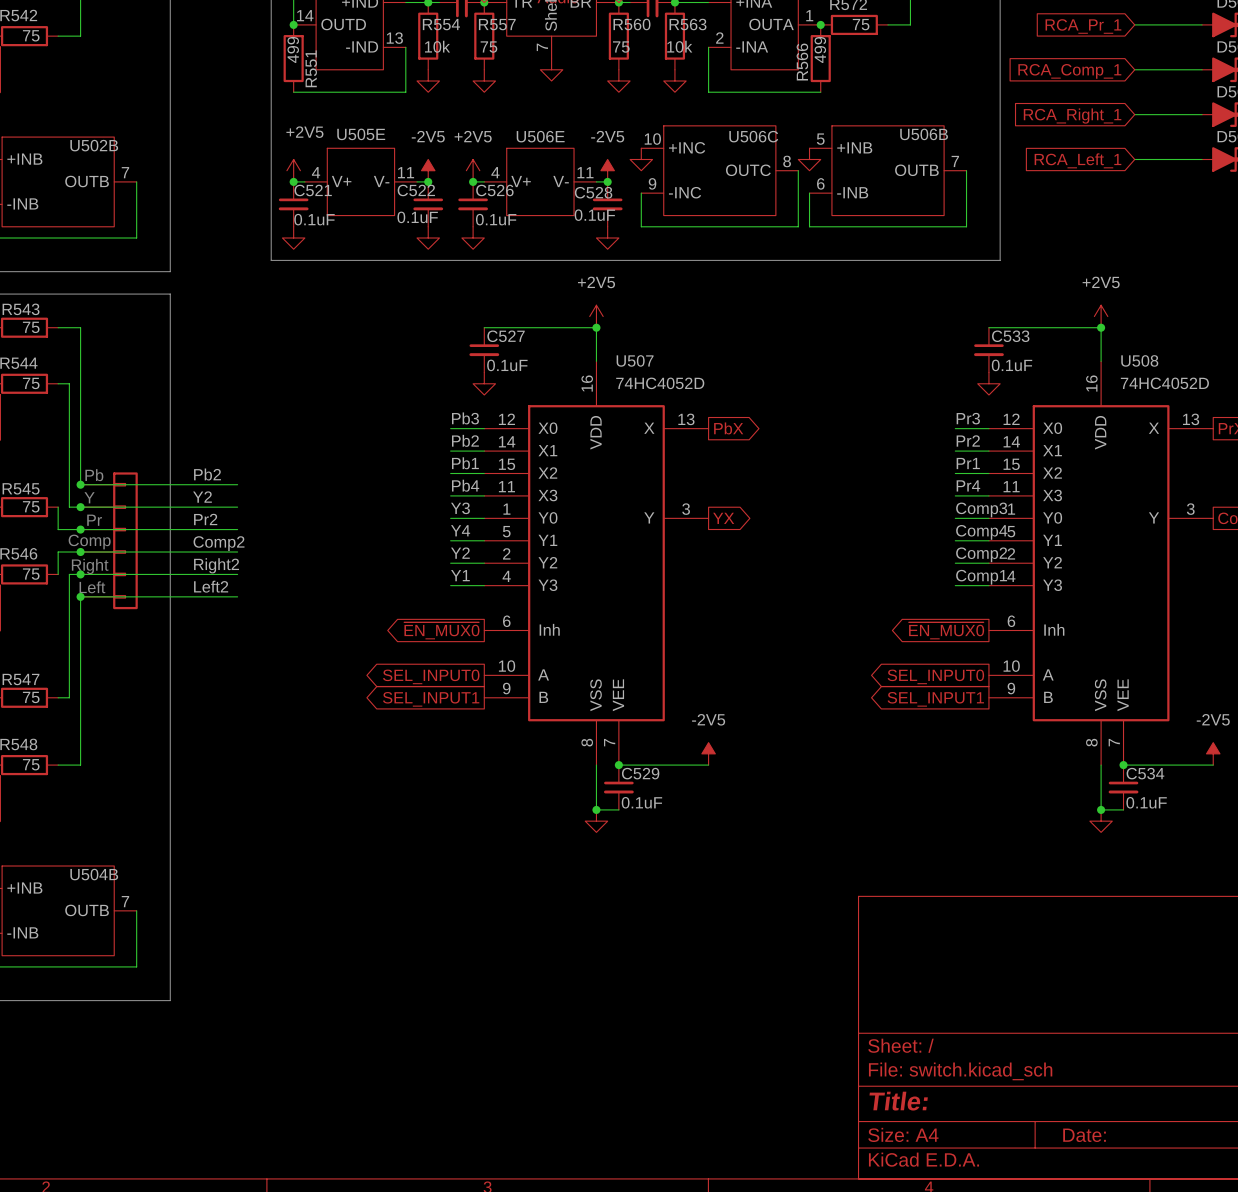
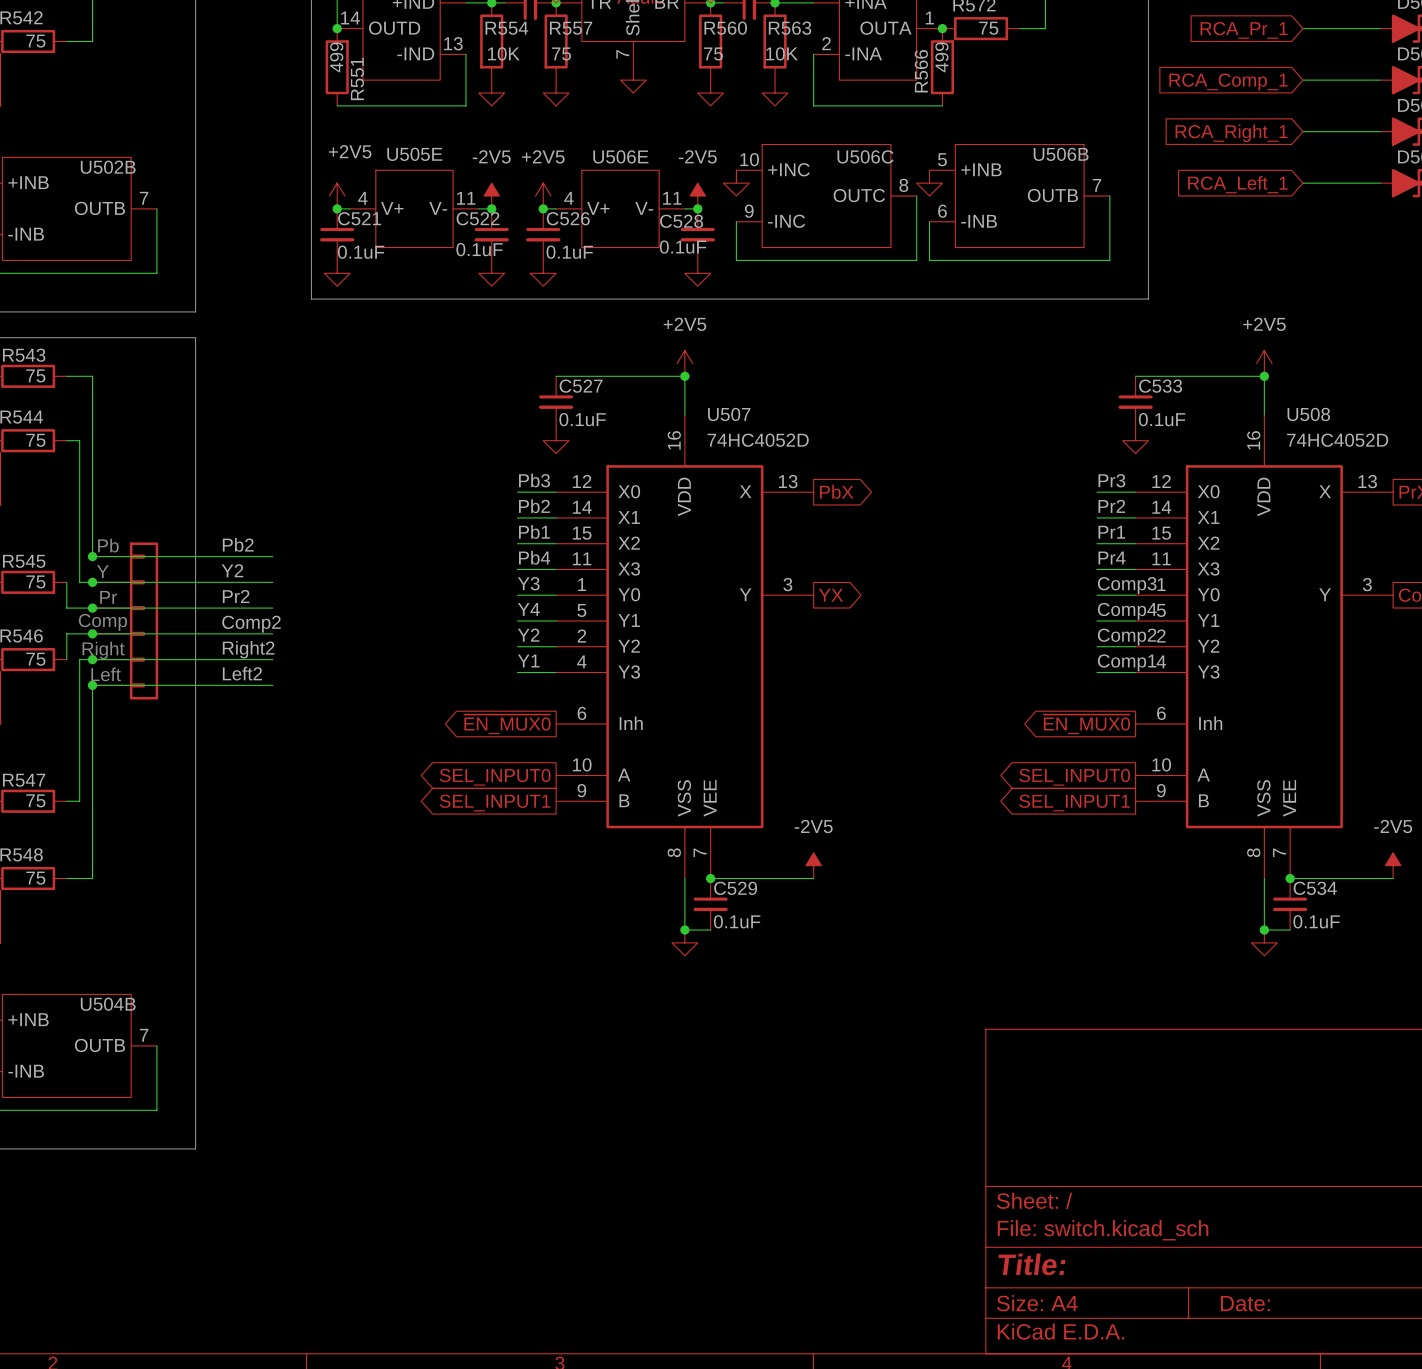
R554 value: 10k (437, 46) -> 10K (503, 53)
R563 value: 10k (679, 46) -> 10K (781, 53)

